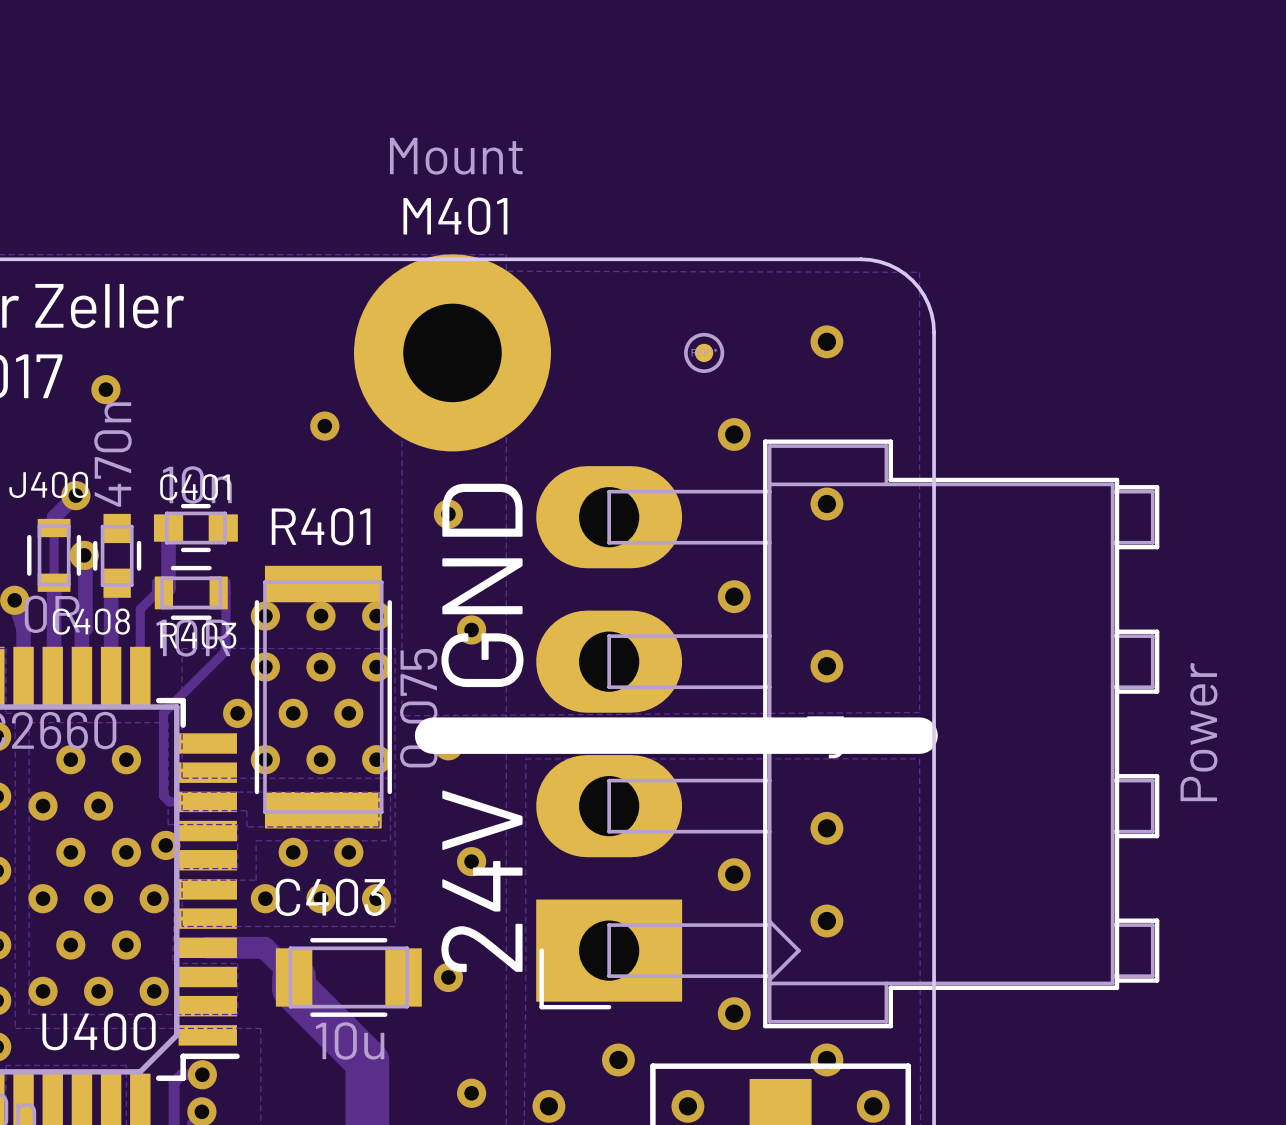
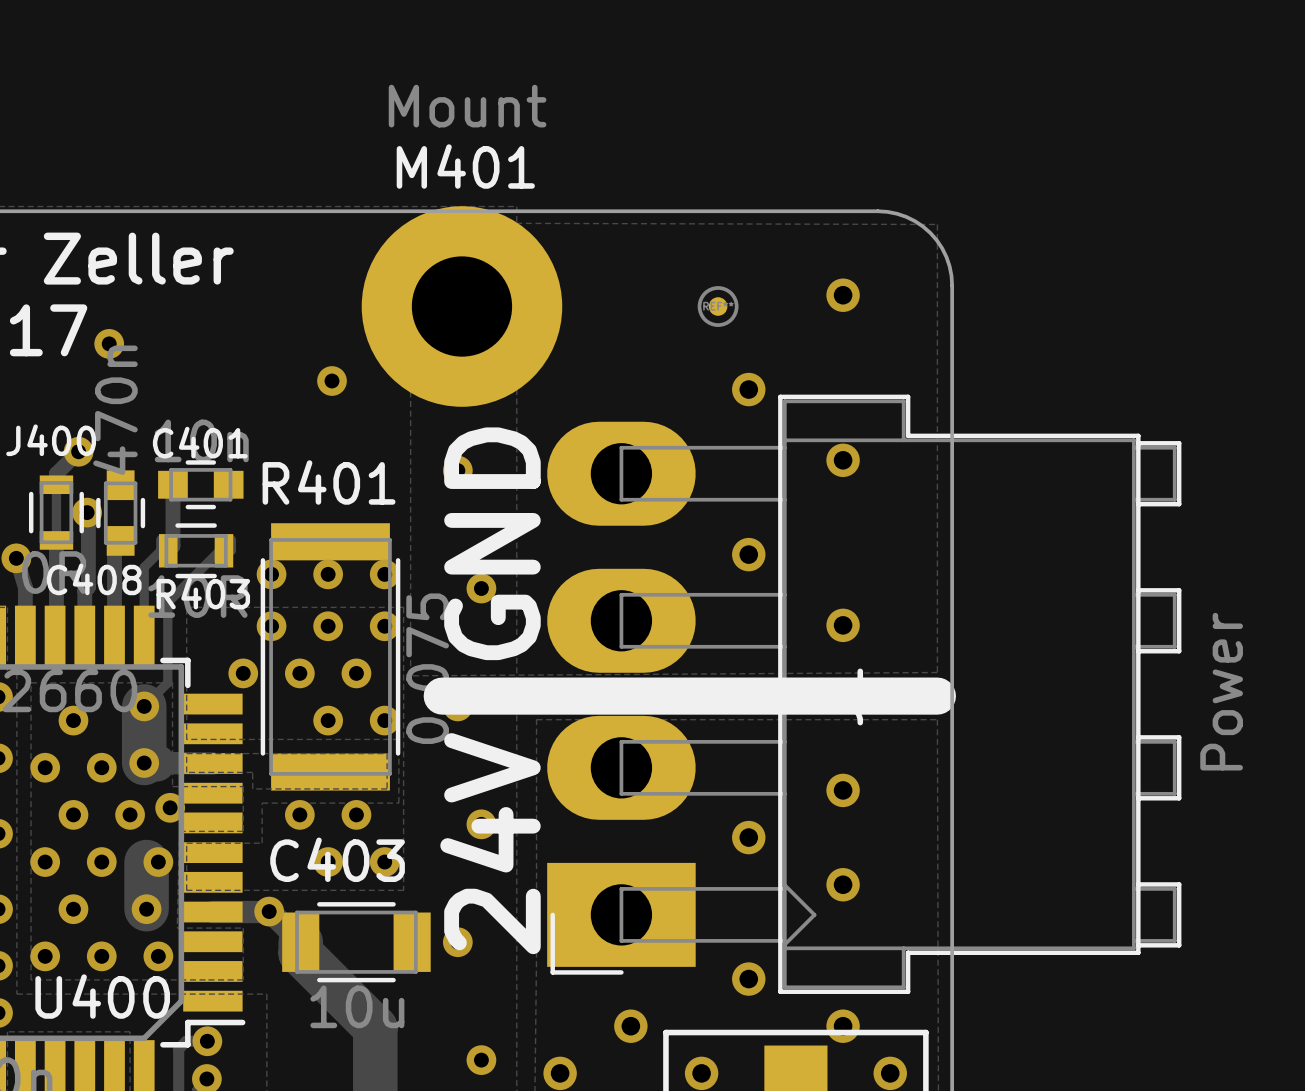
track: (225, 592) (225, 650) (163, 713) -> (223, 550) (219, 550) (167, 602) (167, 673)
track: (163, 722) (163, 795) (169, 801) (188, 801) -> (167, 682) (144, 706) (144, 763) (212, 763)
via position: (126, 759) -> (144, 706)
via: (265, 759) -> none
via: none -> (144, 763)
track: none -> (146, 862) (146, 909)
via position: (265, 898) -> (269, 911)
via position: (126, 945) -> (146, 909)

